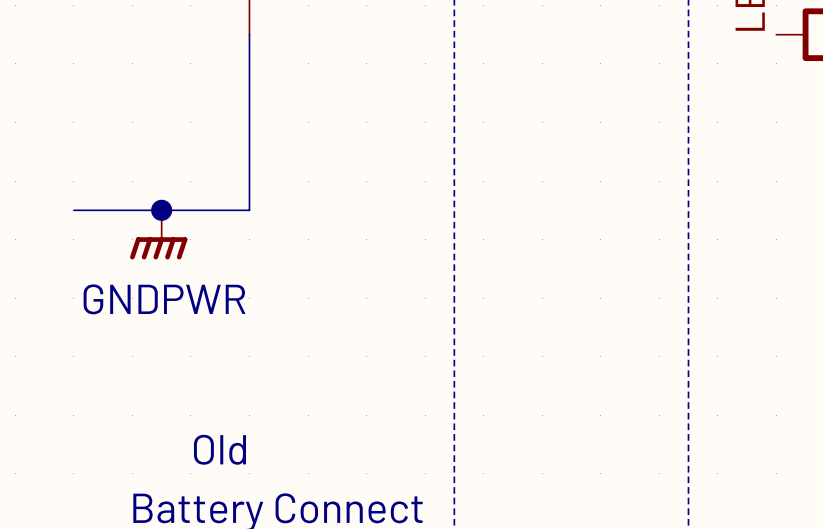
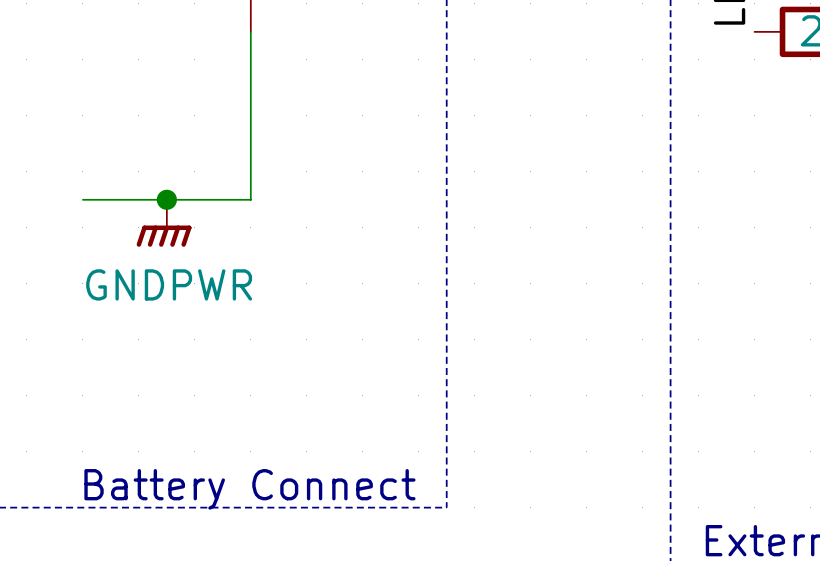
text: Old (219, 449) -> none

